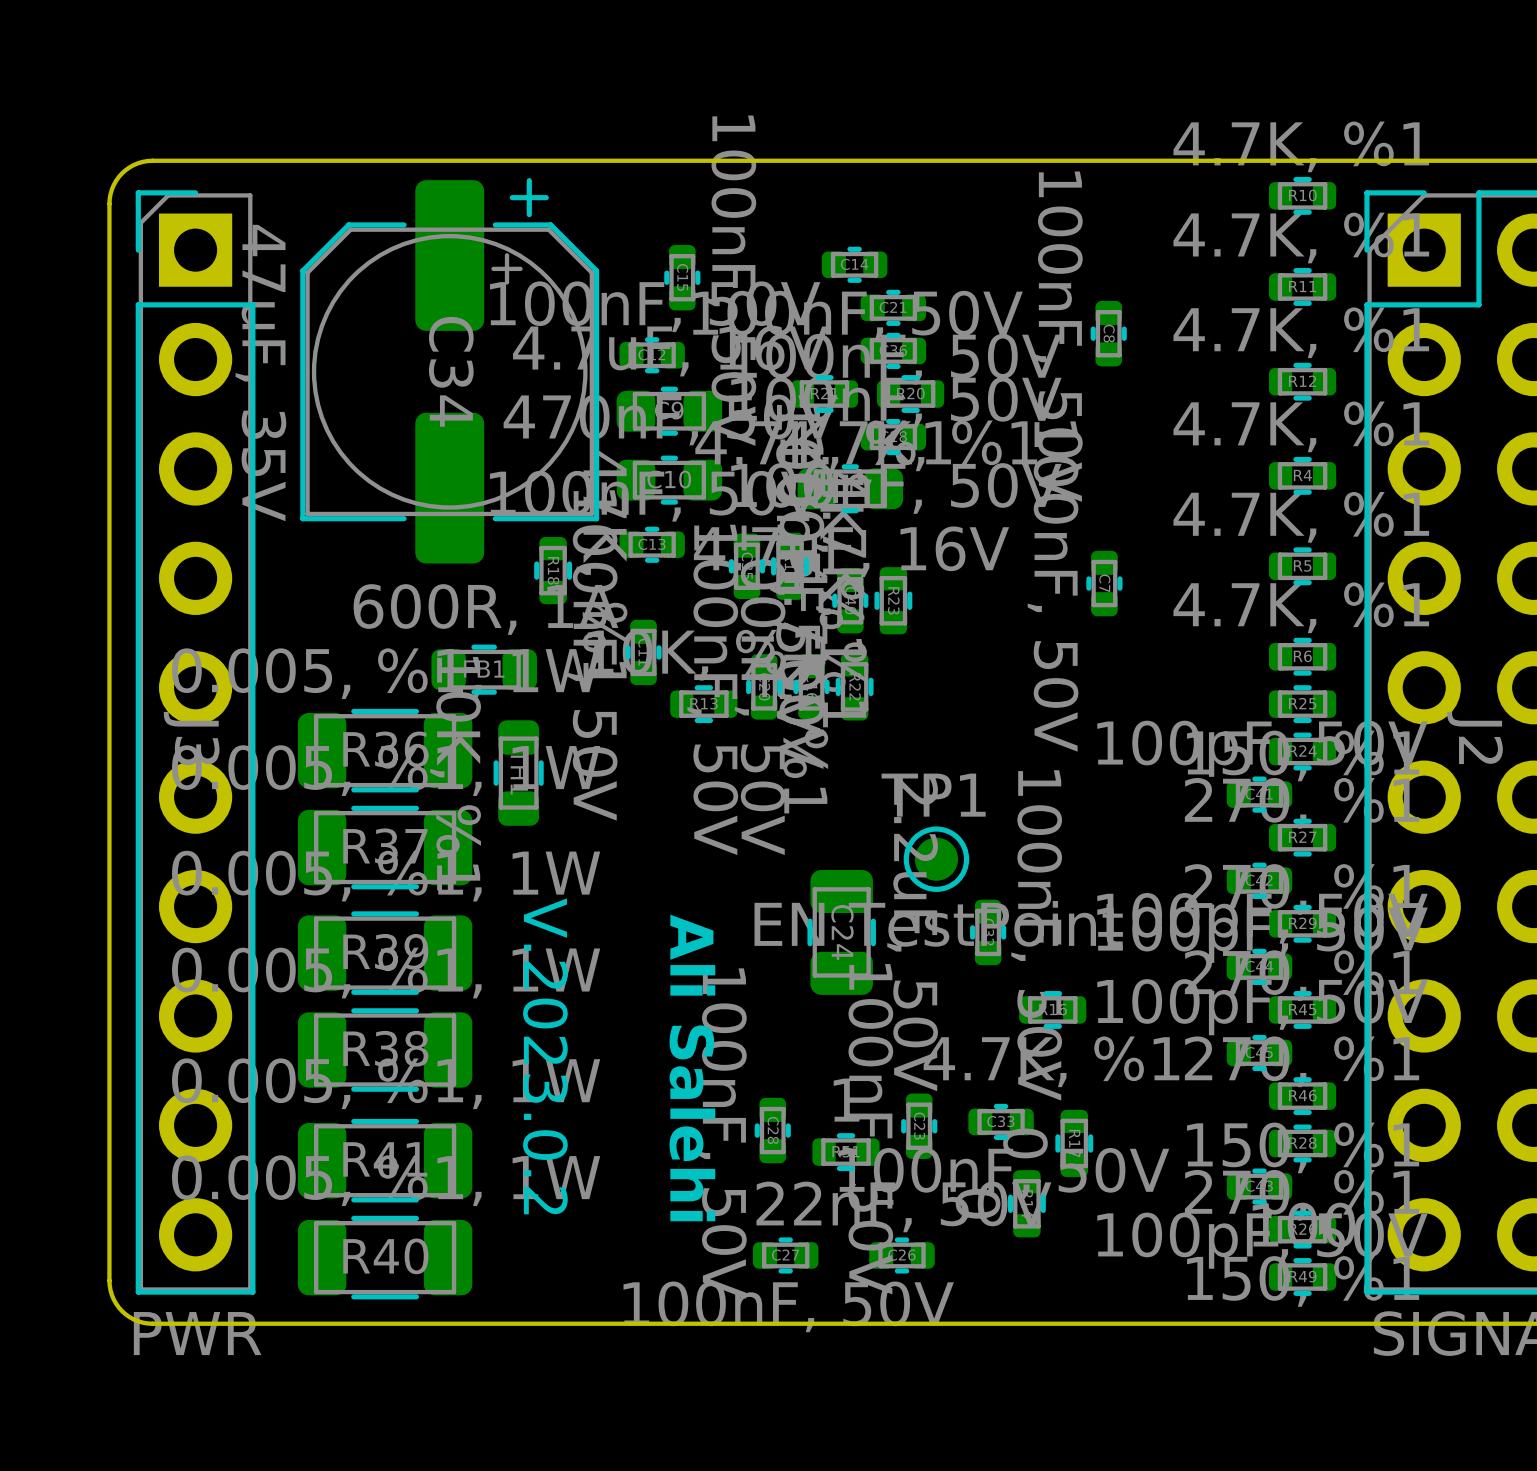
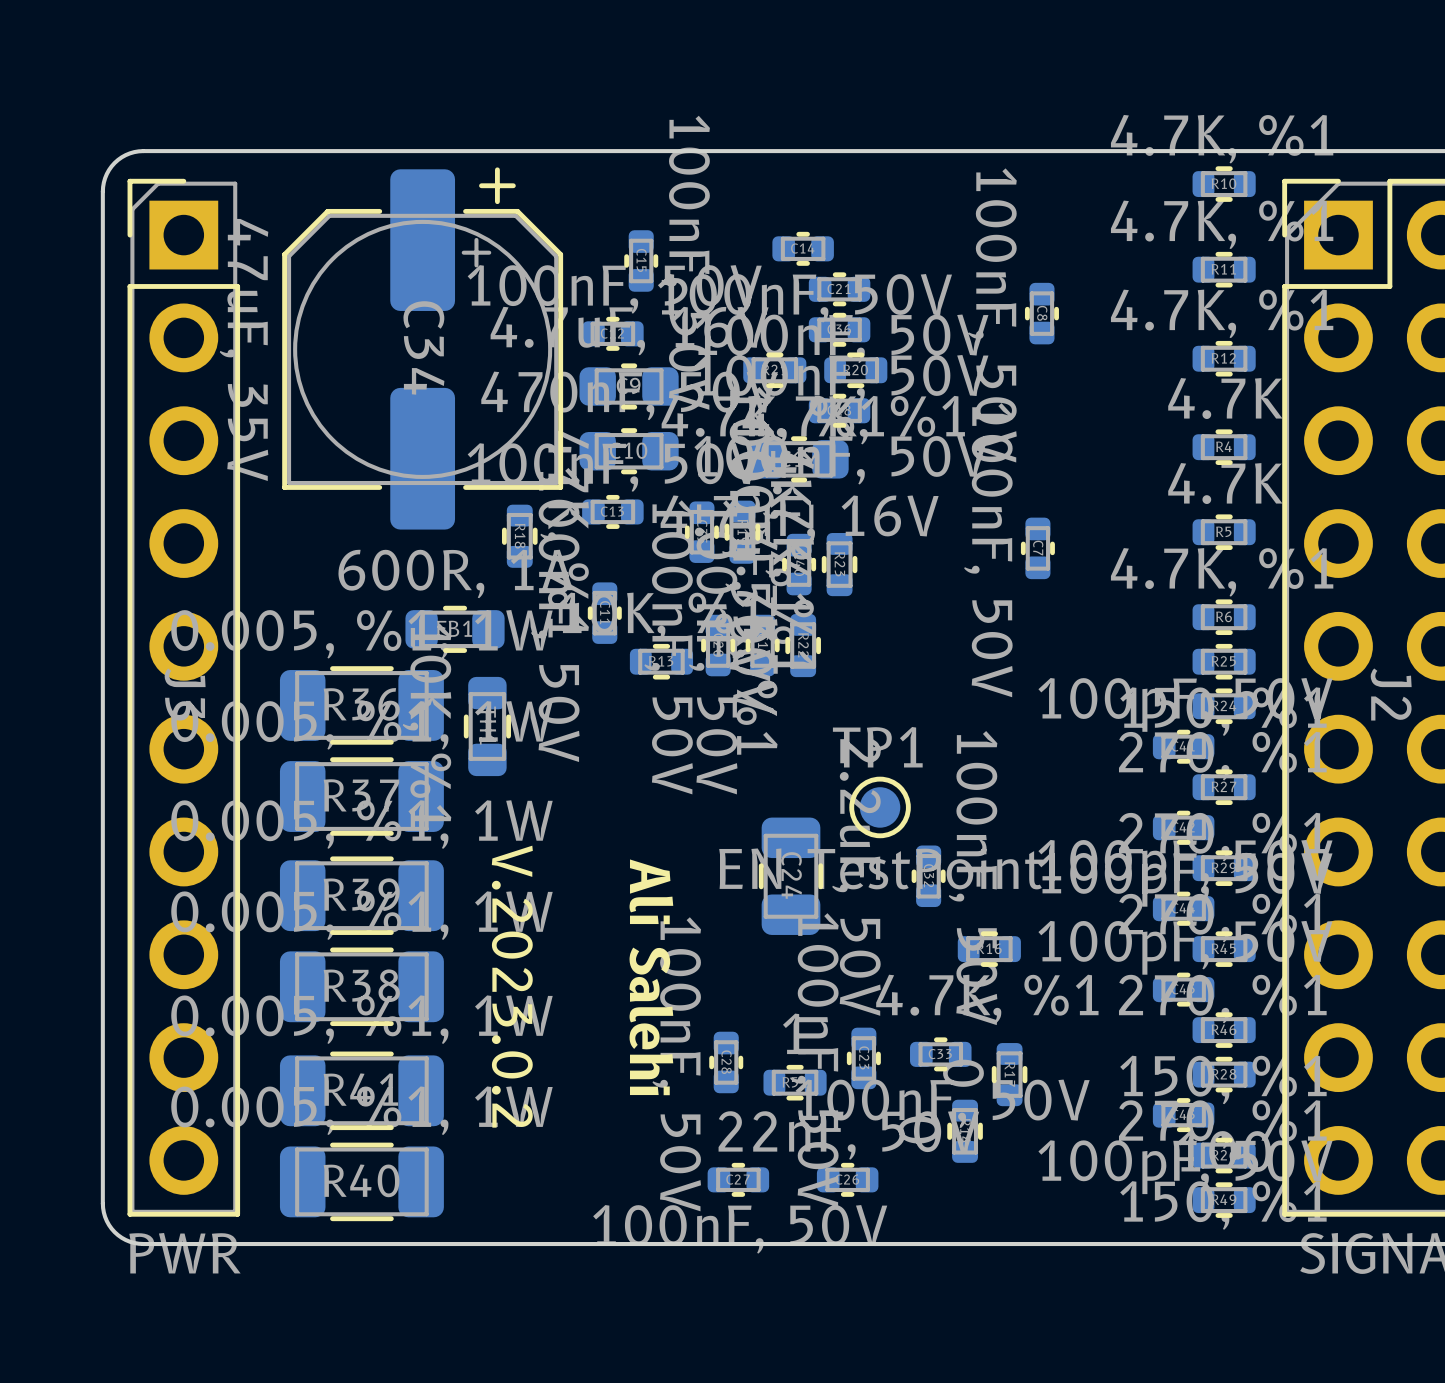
R4 value: 4.7K, %1 (1301, 426) -> 4.7K (1225, 398)
R5 value: 4.7K, %1 (1301, 517) -> 4.7K (1225, 483)

